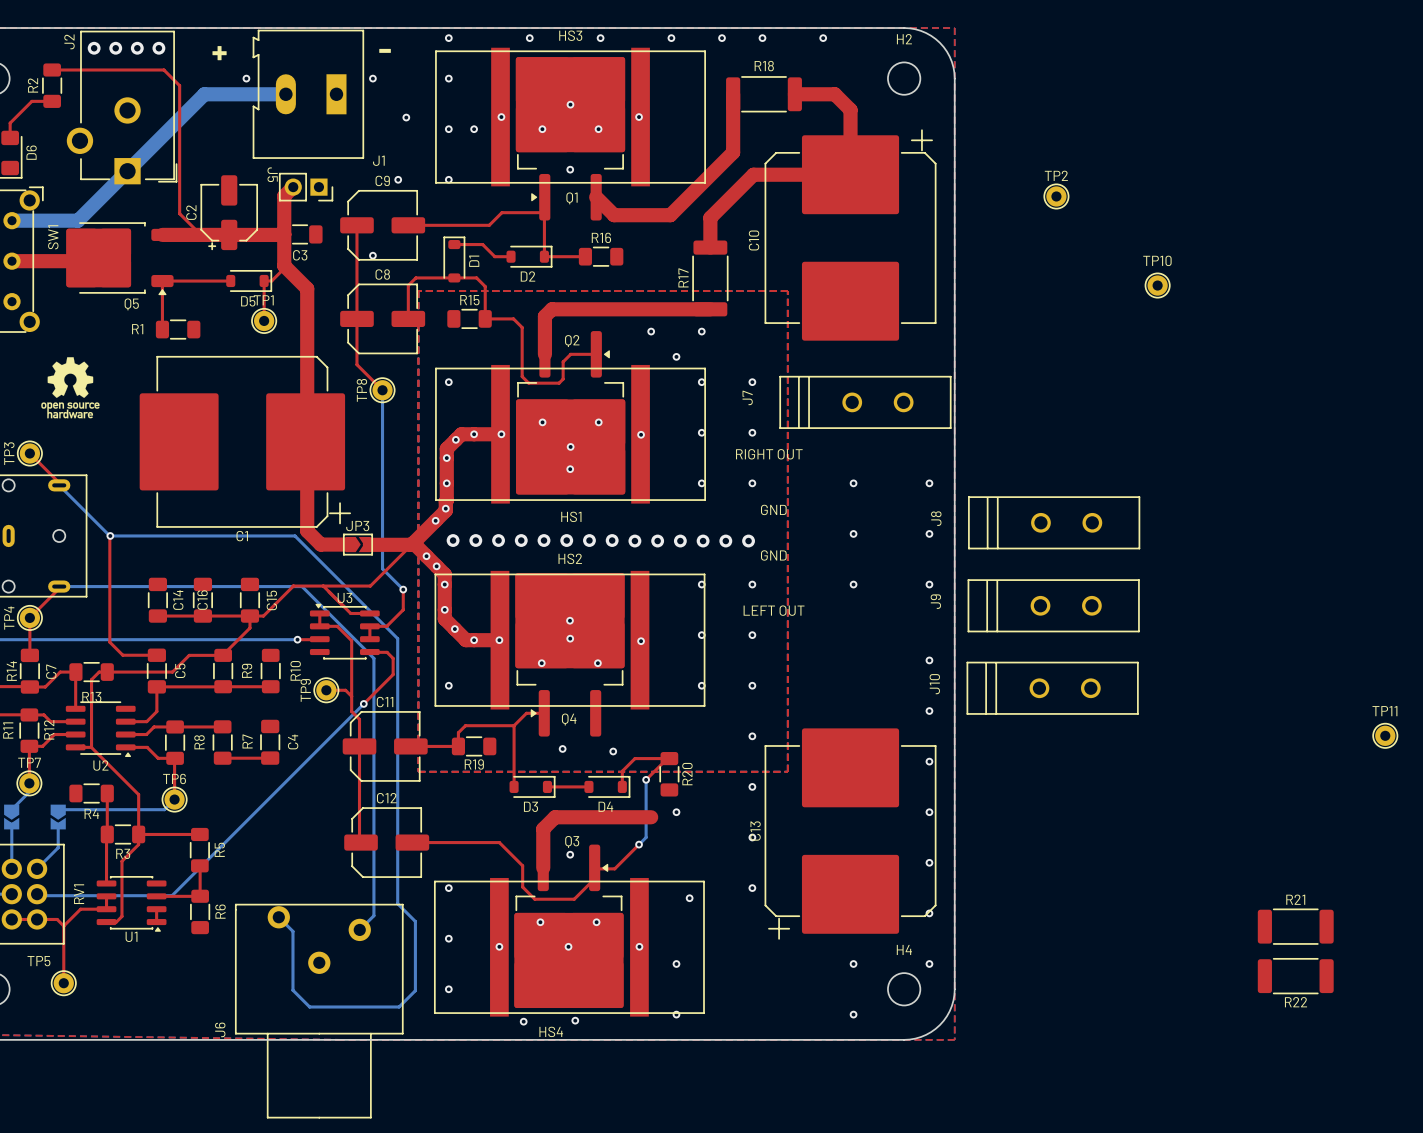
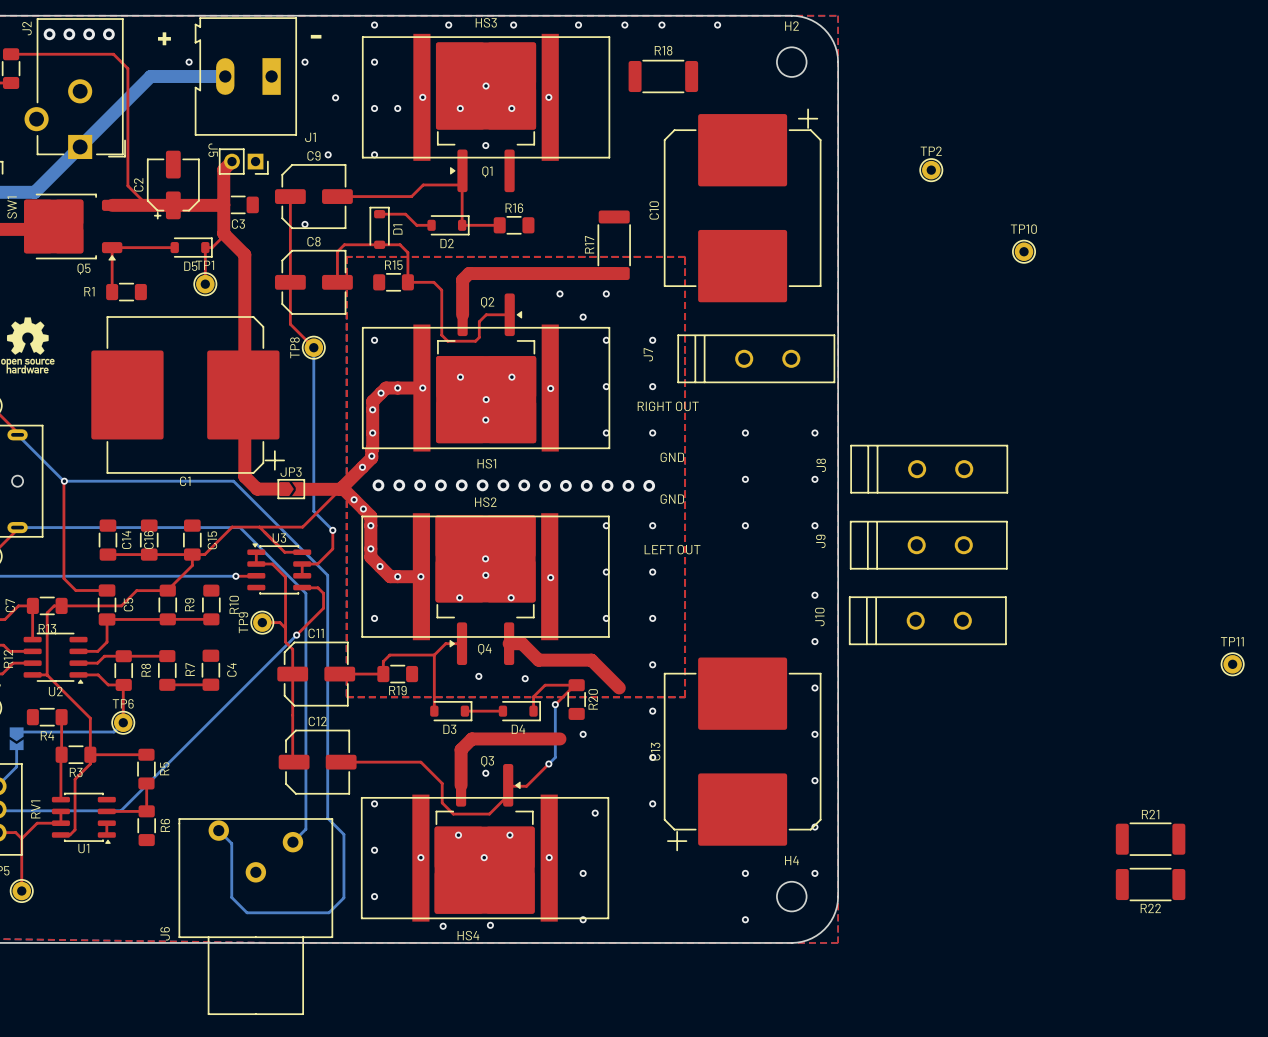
top track: (733, 94) (733, 152) (670, 215) (614, 215) (596, 197) -> none
top track: (794, 94) (834, 94) (850, 109) (850, 174) (753, 174) (710, 217) (710, 247) -> none
top track: none -> (509, 643) (522, 643) (538, 660) (591, 660) (619, 687)

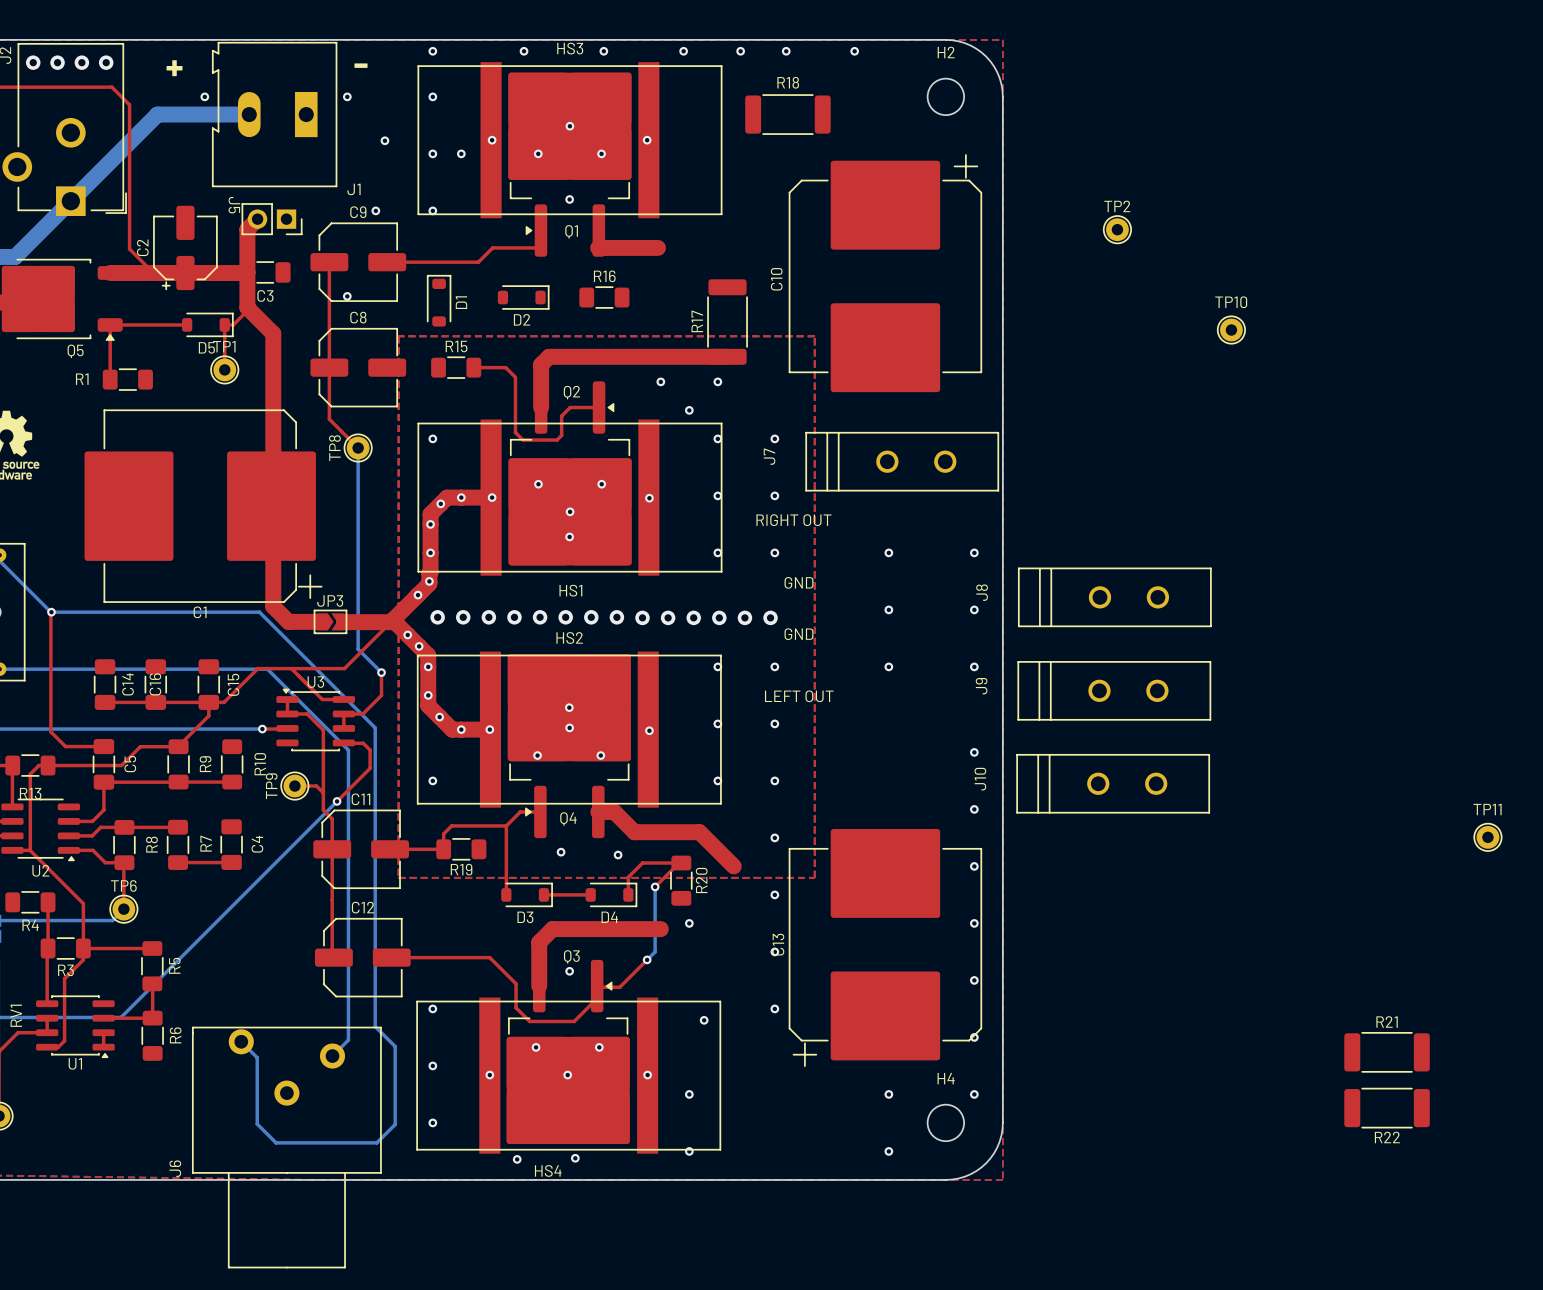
top track: (462, 170) (462, 225) (499, 225) -> none
top track: none -> (598, 247) (657, 247)
top track: (379, 214) (405, 214) (416, 225) (431, 225) -> none
top track: (337, 282) (337, 251) (344, 244) (400, 244) (407, 252) (407, 282) -> none

